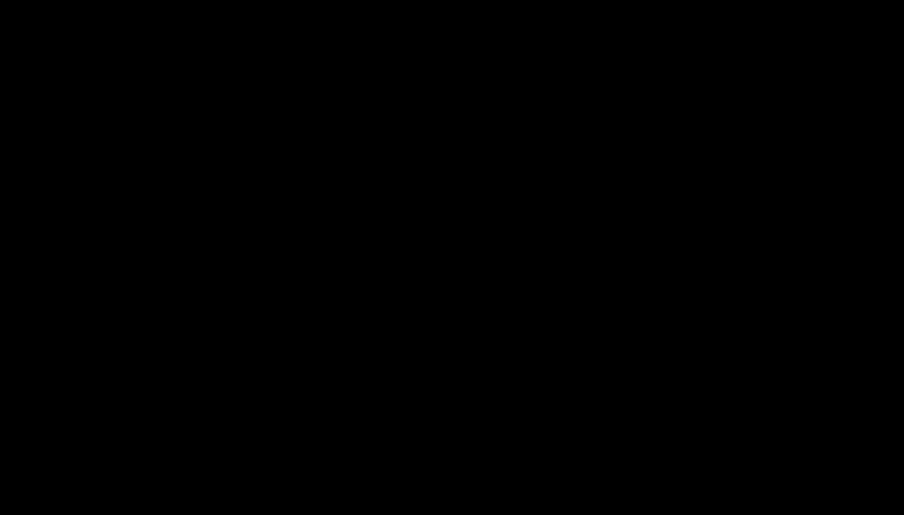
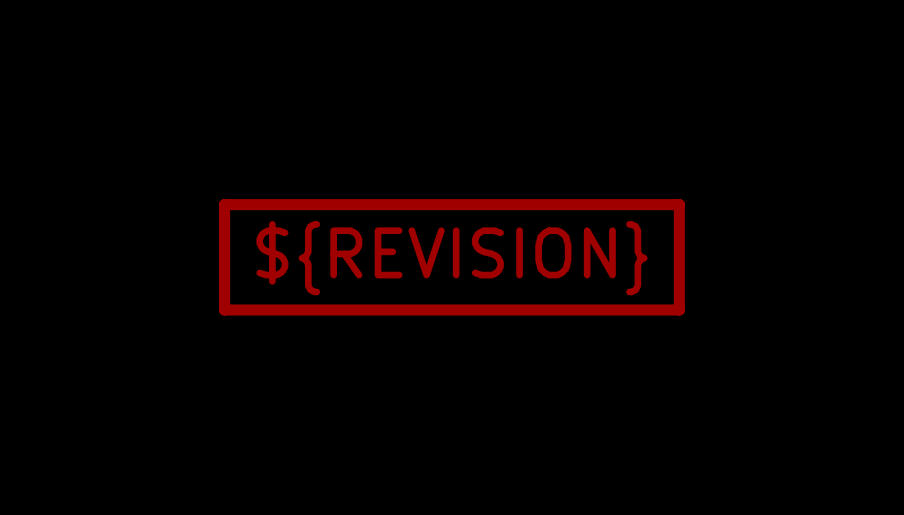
track: none -> (224, 204) (679, 204) (679, 309) (224, 309) (224, 204)
text: none -> ${REVISION} (451, 258)

